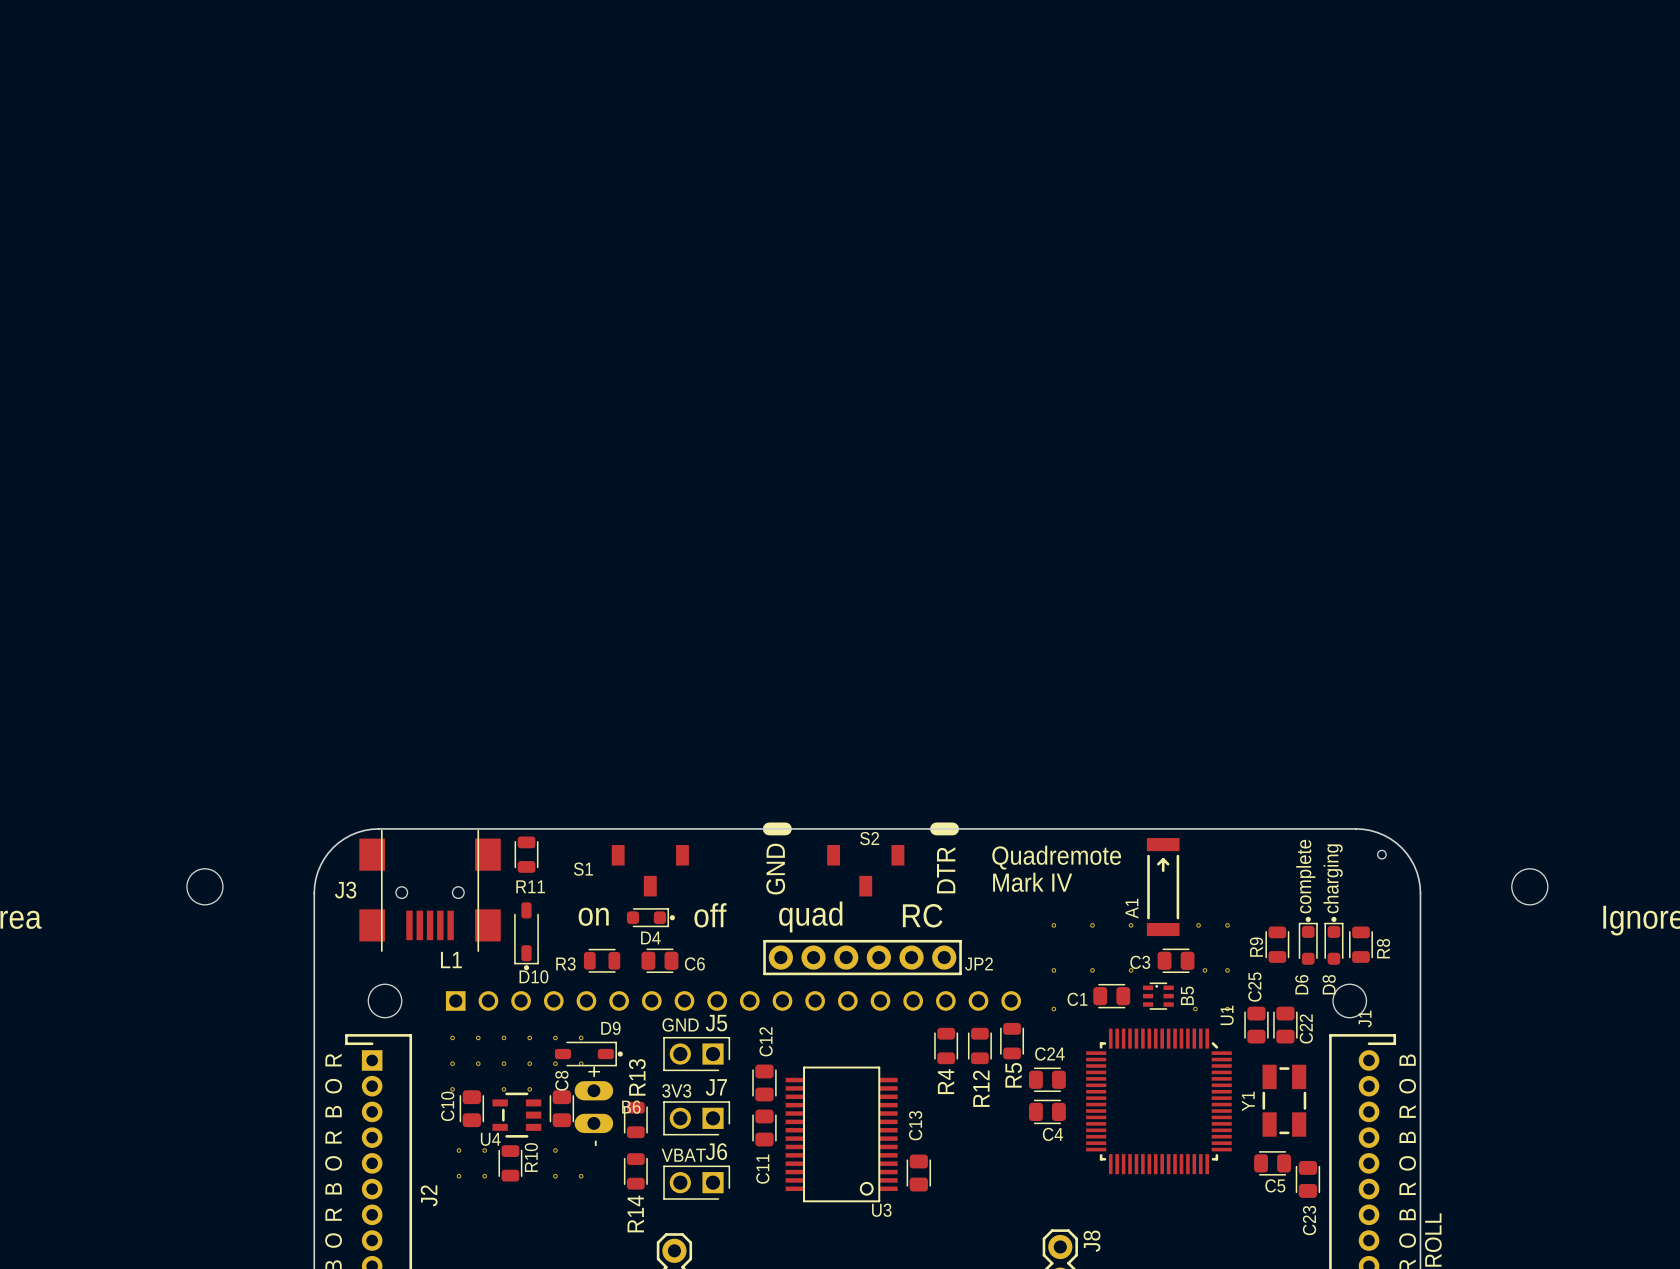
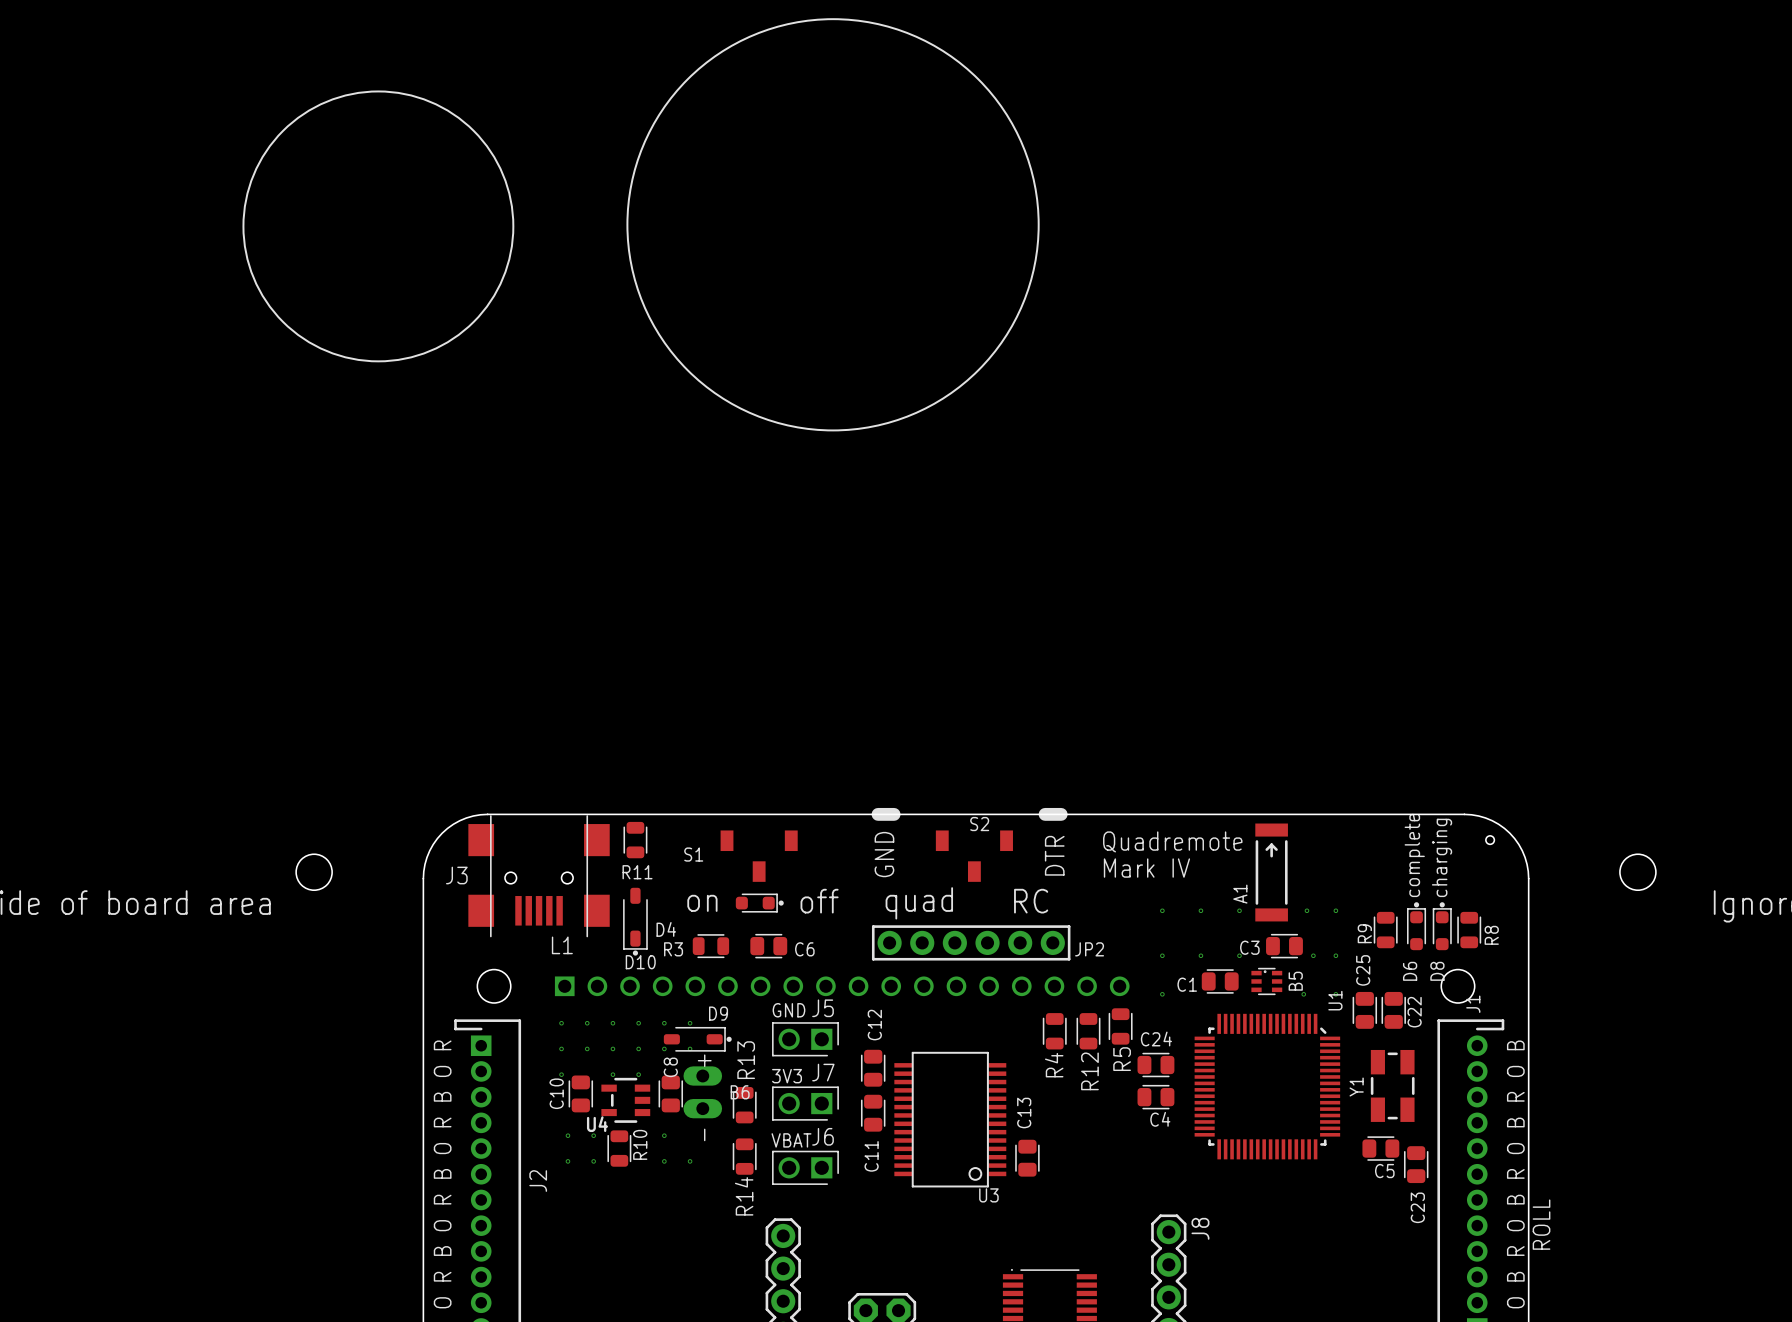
drawing: none -> [626, 18, 1040, 432]
drawing: none -> [242, 90, 515, 363]
D4 name position: D4 (650, 937) -> D4 (666, 929)

